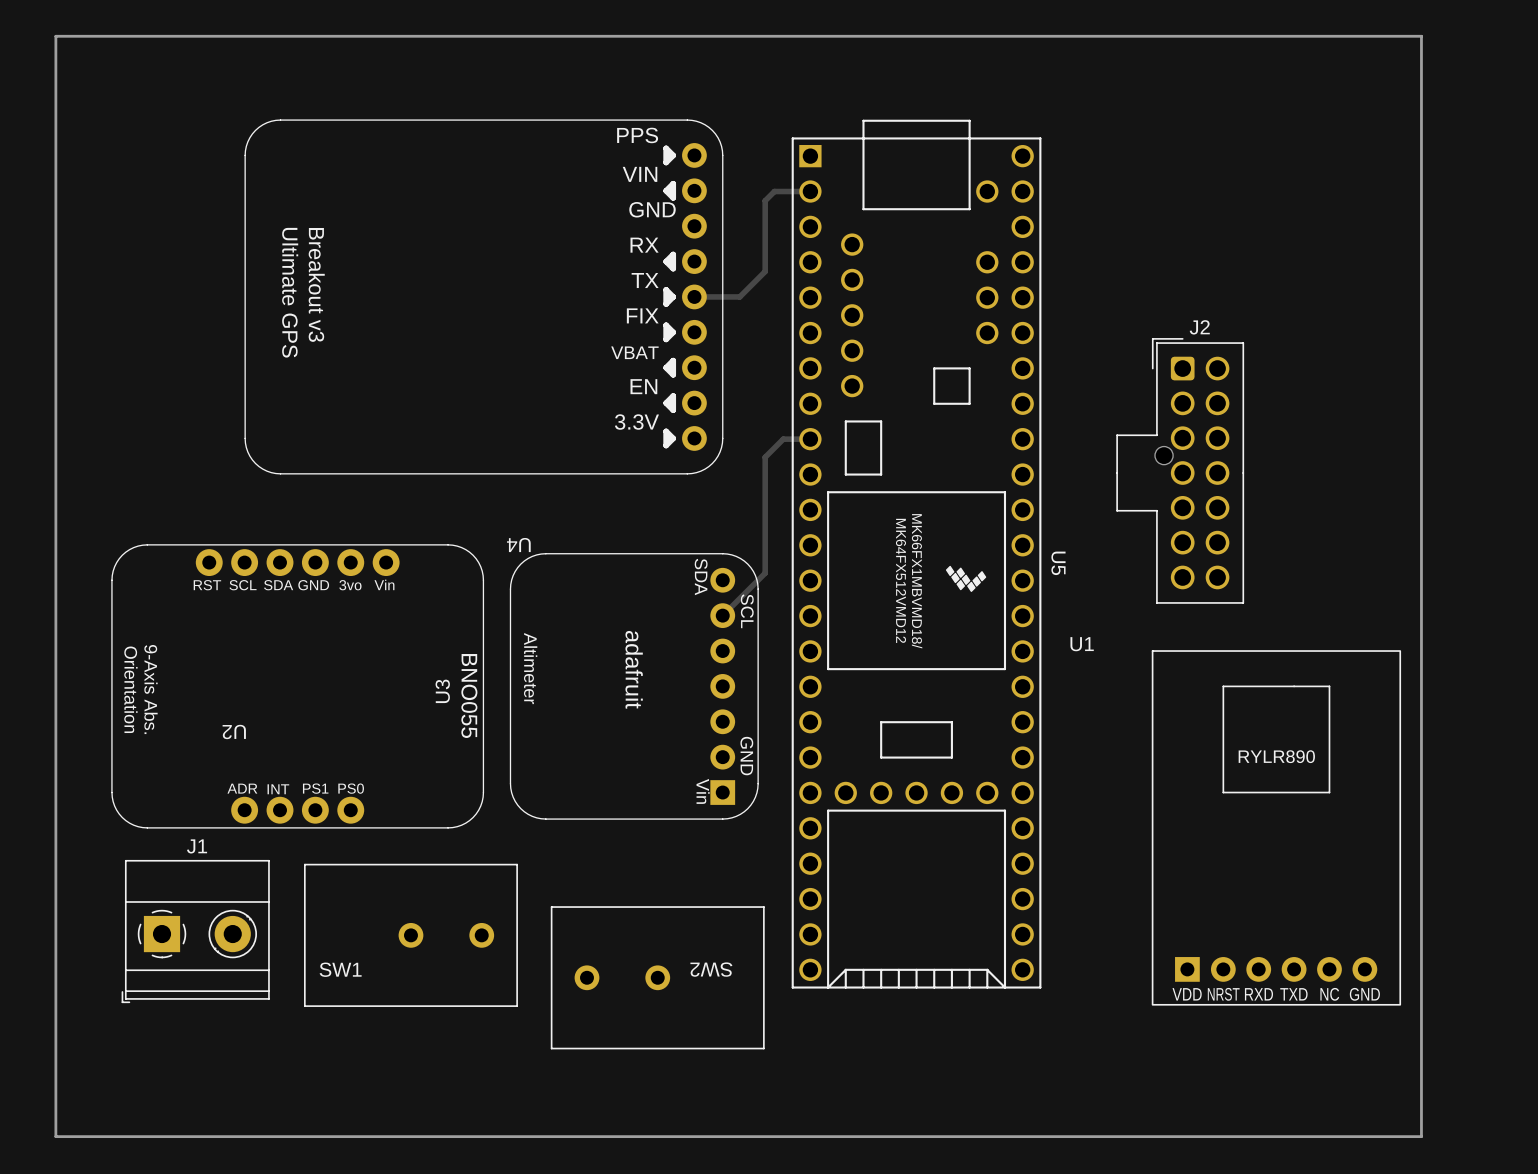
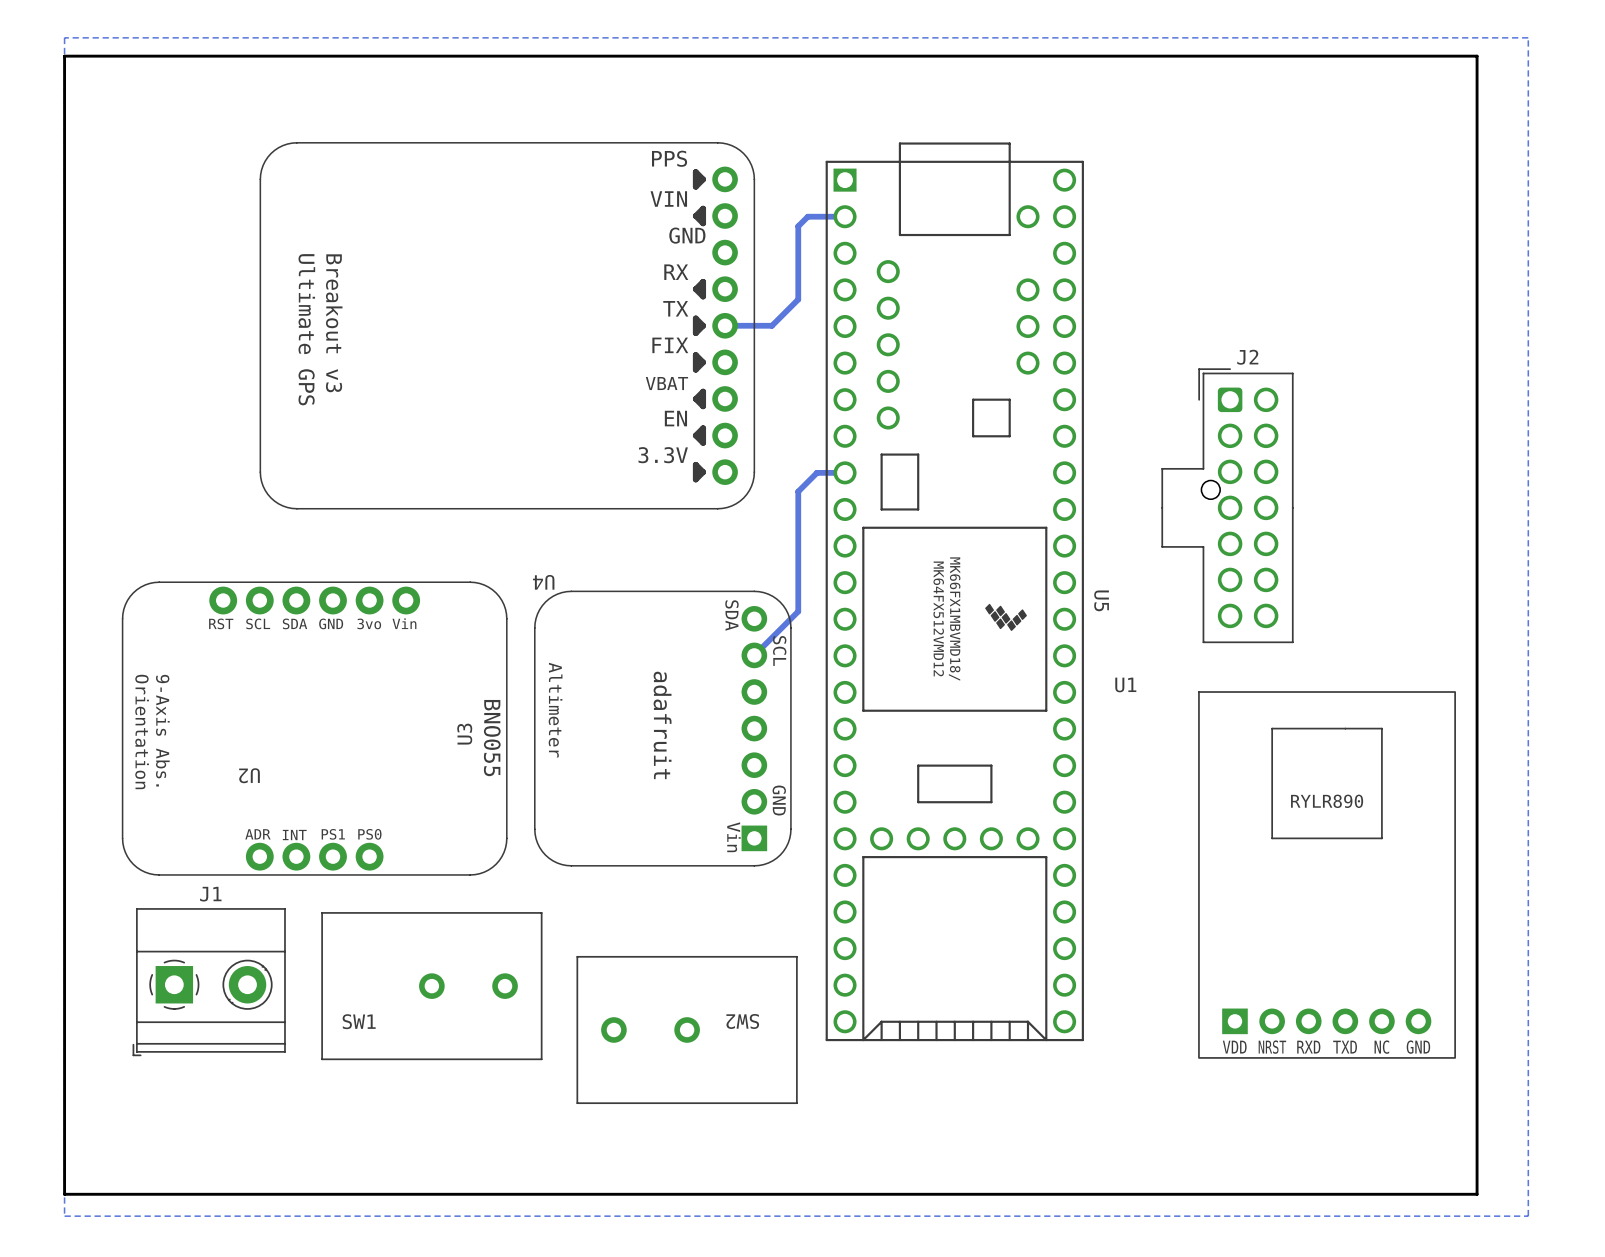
zone outline: none -> (1528, 37) (1528, 1216) (64, 1216) (64, 37) (1528, 37)

